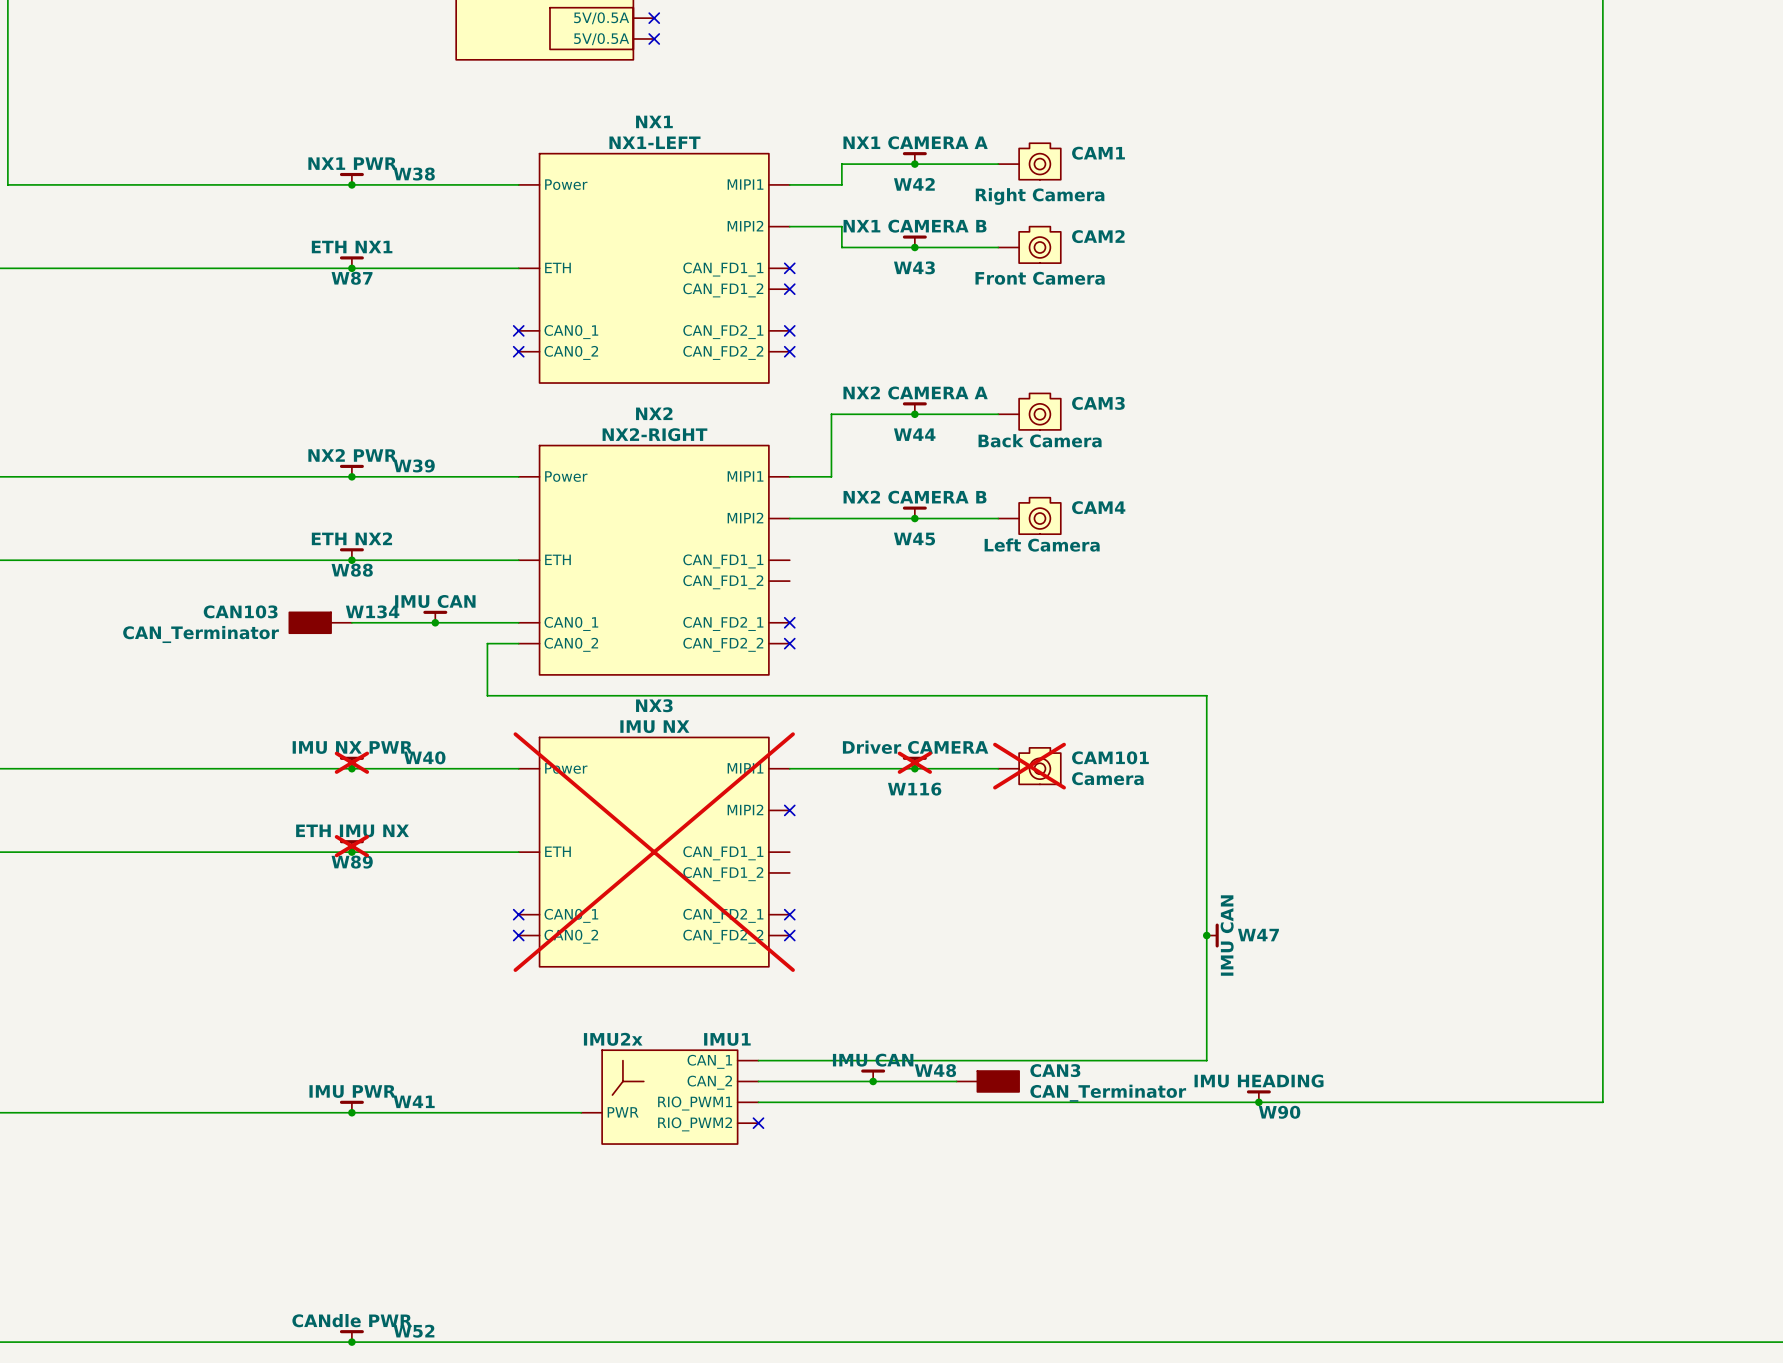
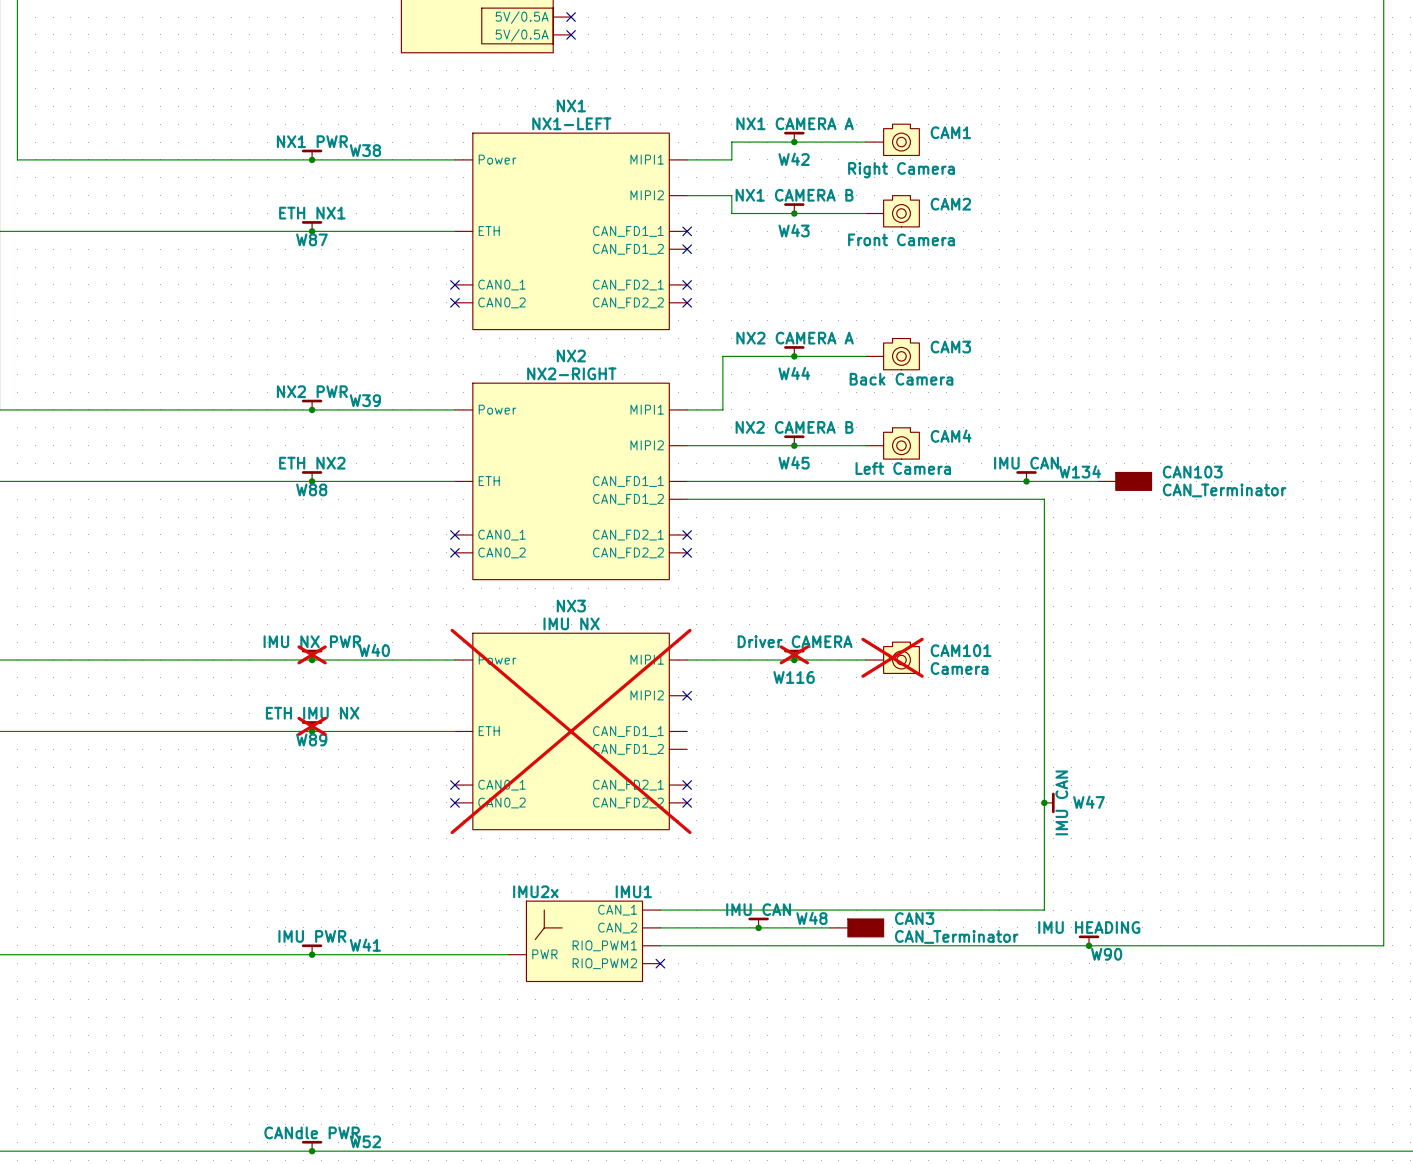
wire: none -> (687, 481) (1097, 481)
junction: none -> (1026, 481)
CAN103 name position: CAN103 (240, 611) -> CAN103 (1192, 472)
W134 name position: W134 (372, 611) -> W134 (1080, 471)
W134 position: (435, 616) -> (1026, 476)
CAN103 rotation: 0° (310, 622) -> 180° (1133, 481)
CAN103 position: (320, 622) -> (1124, 481)
wire: (351, 622) (518, 622) -> none
junction: (435, 622) -> none
no-connect mark: none -> (454, 534)
CAN103 value position: CAN_Terminator (201, 634) -> CAN_Terminator (1224, 490)
wire: (518, 643) (487, 643) (487, 695) (1206, 695) -> (687, 499) (1044, 499) (1044, 597)
no-connect mark: none -> (454, 552)

